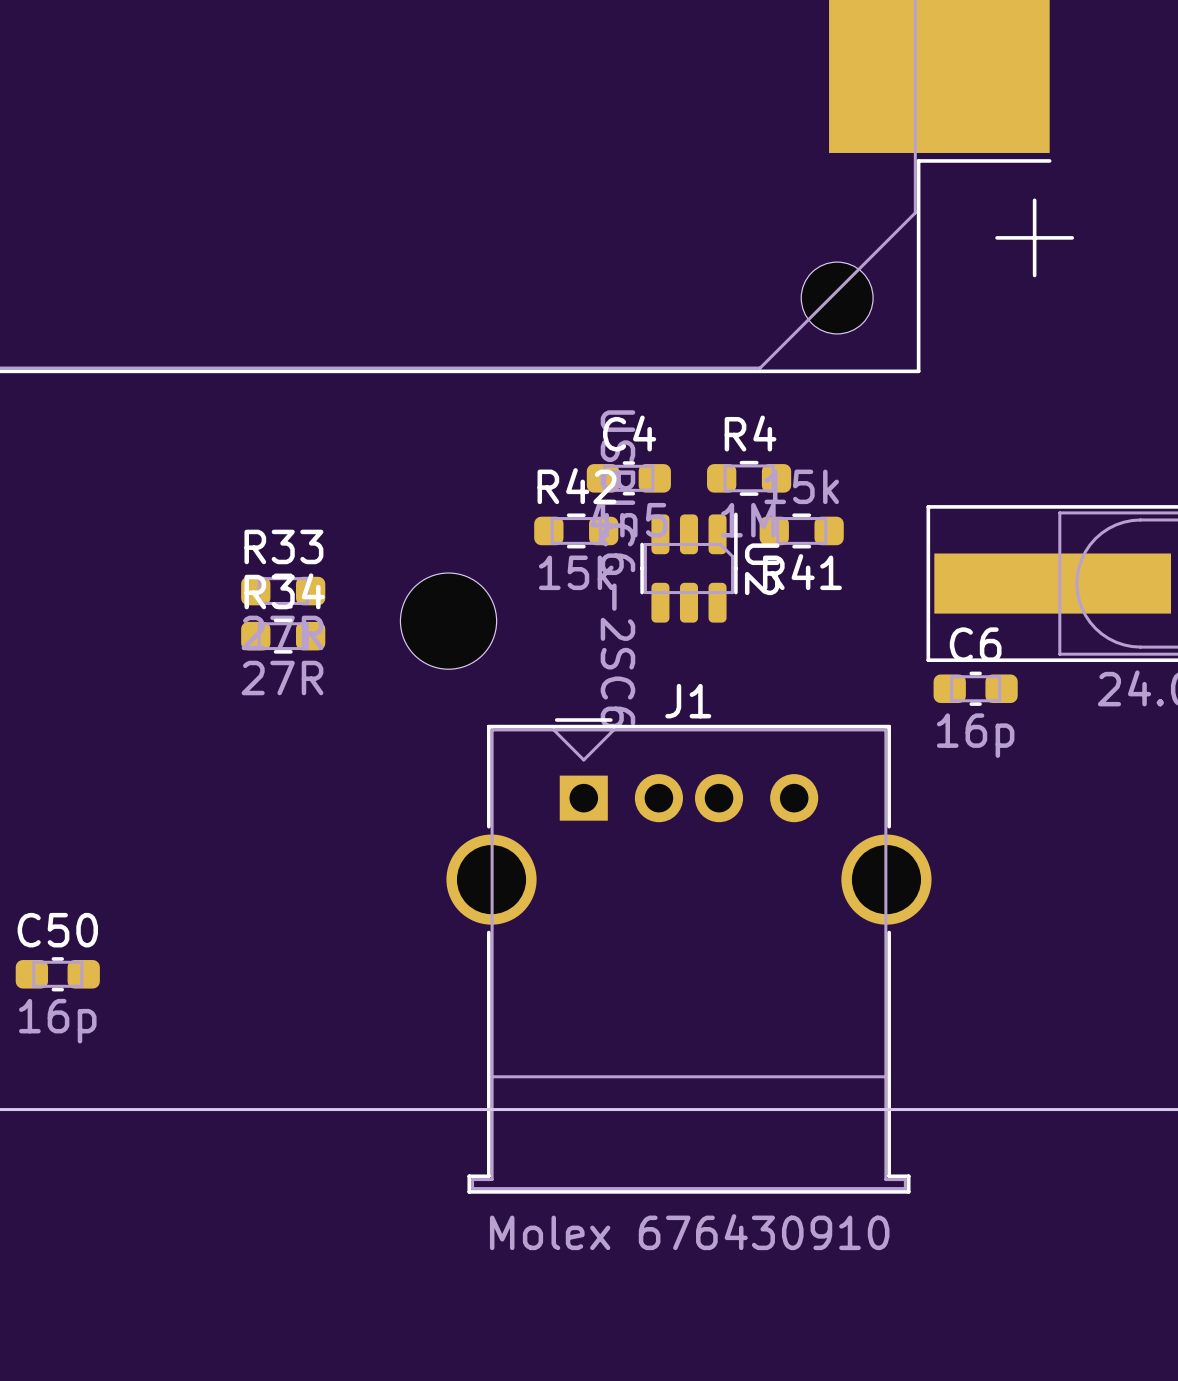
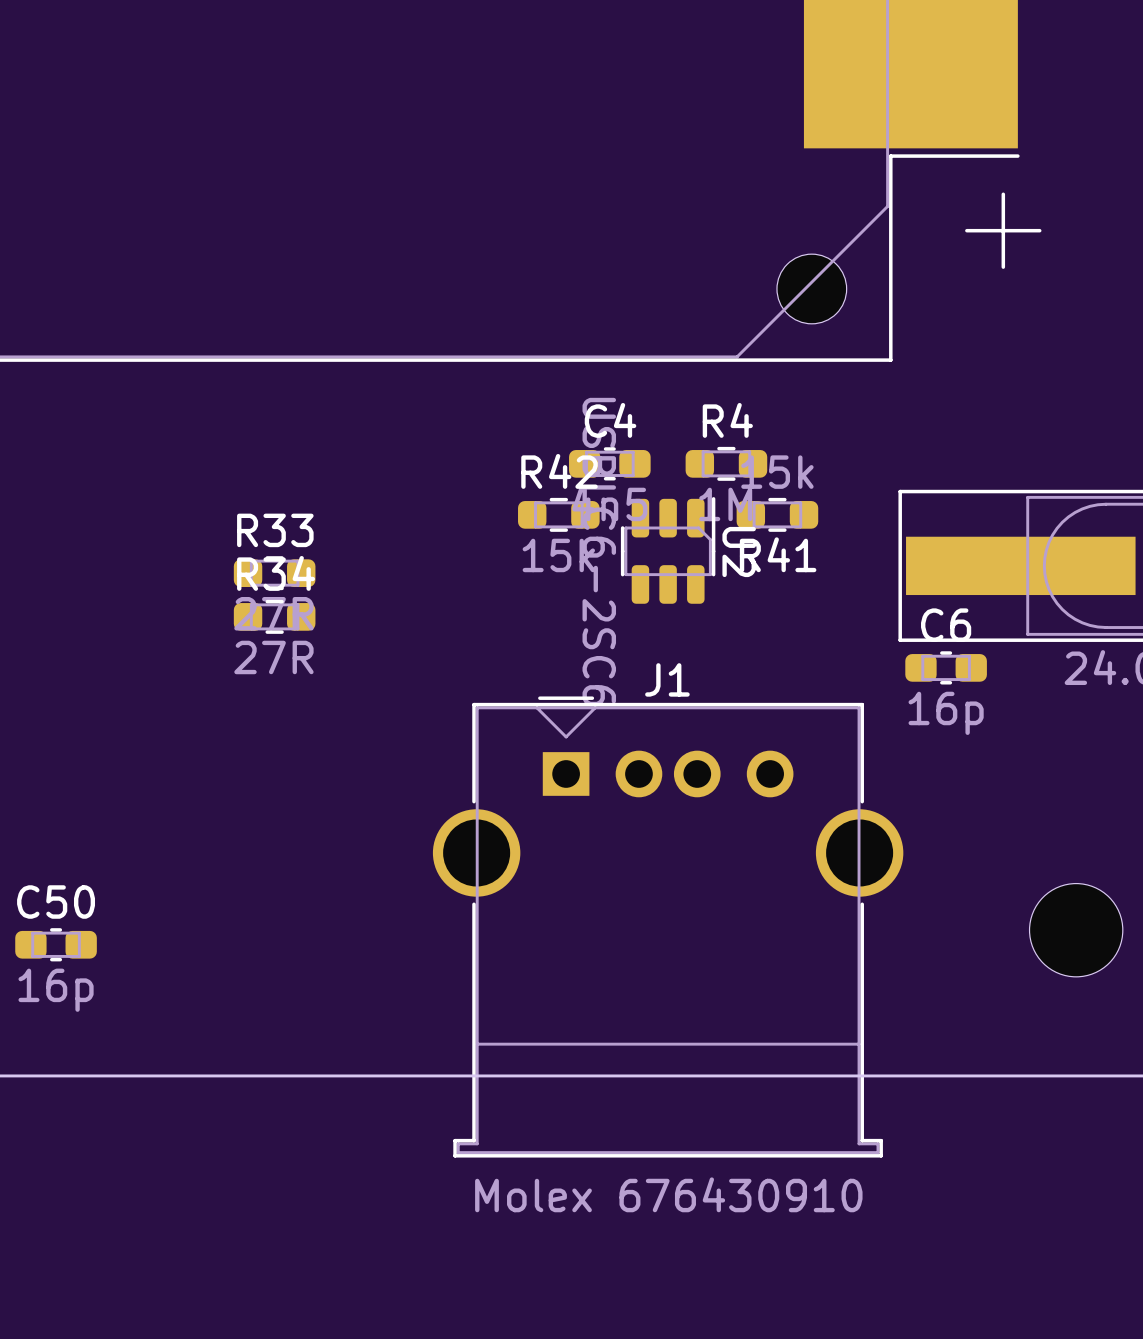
part position: (448, 621) -> (1076, 930)

